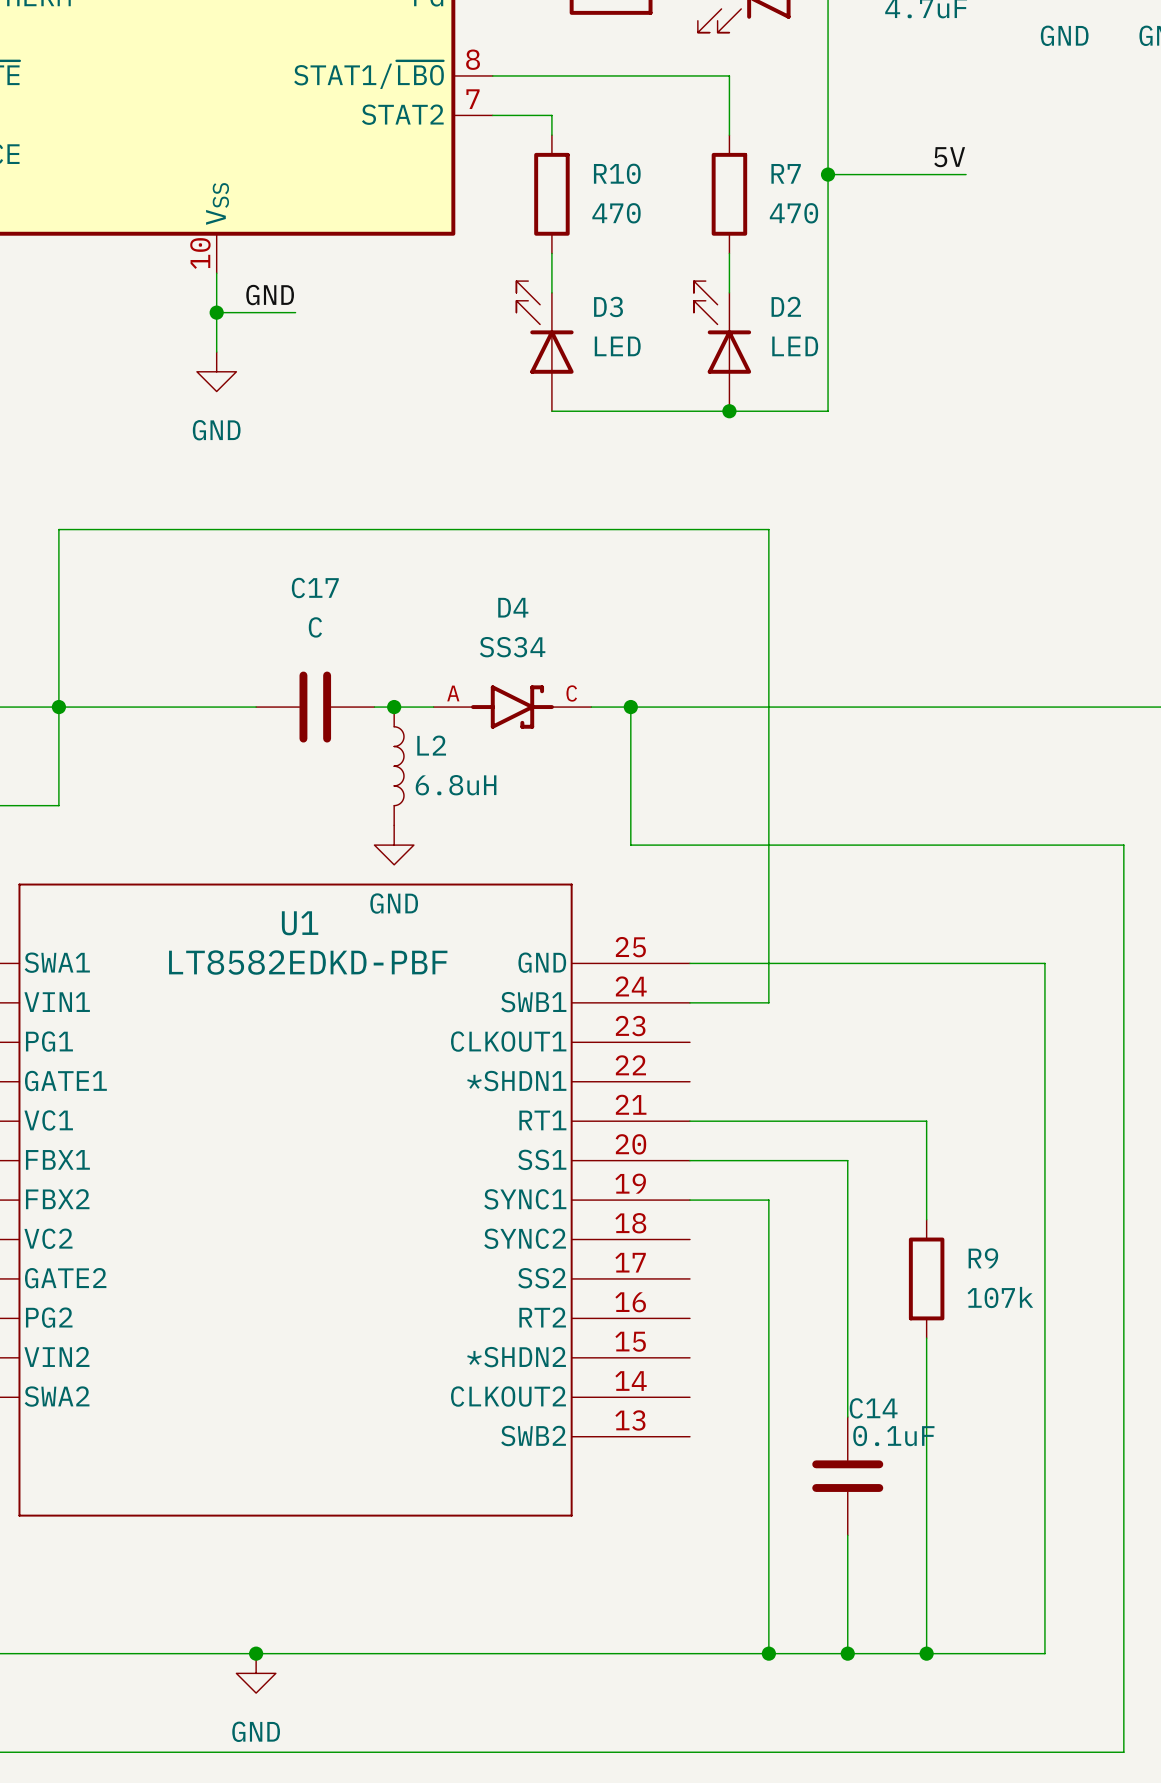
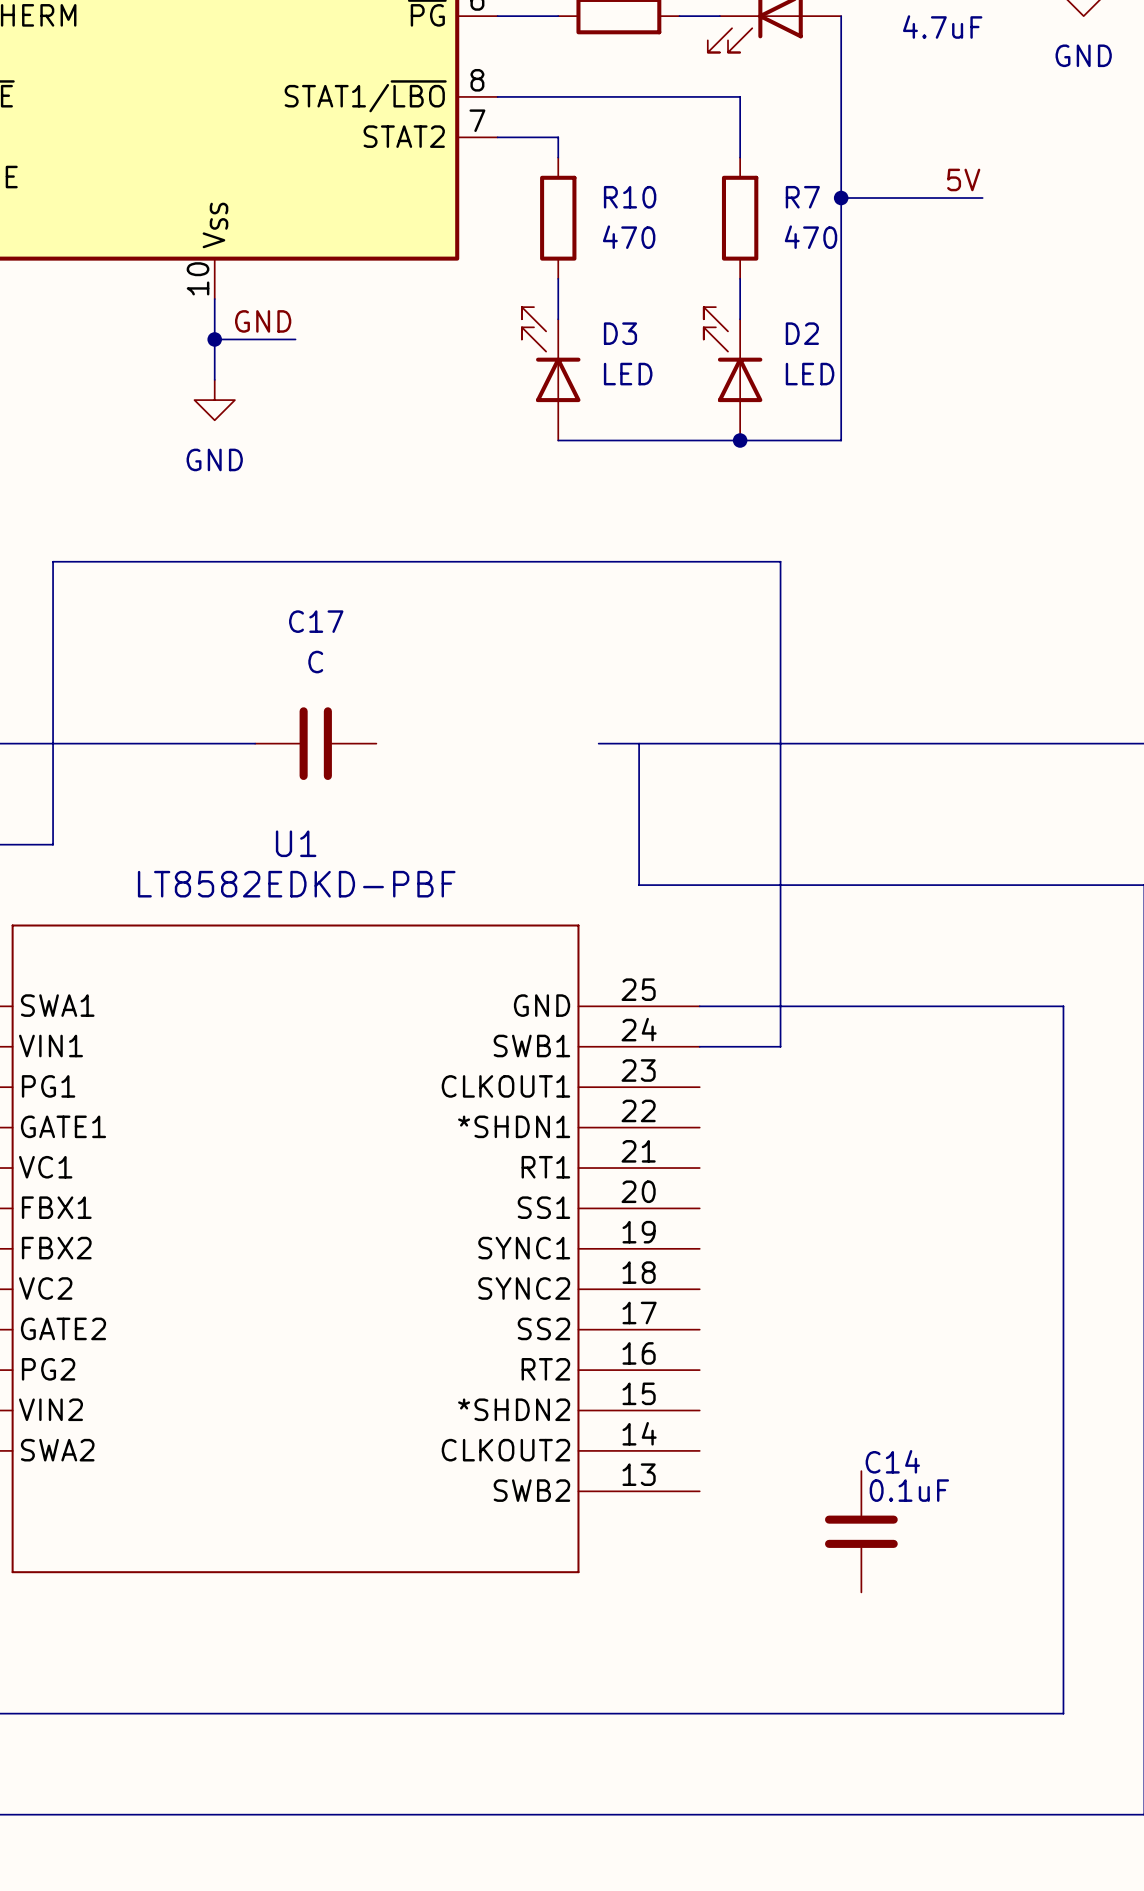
junction: (58, 707) -> none
wire: (374, 707) (433, 707) -> none
junction: (394, 707) -> none
D4: SS34 (512, 707) -> none
junction: (630, 707) -> none
L2: 6.8uH (399, 766) -> none
power symbol: GND (394, 845) -> none
U1 name position: U1 (300, 923) -> U1 (296, 843)
U1 value position: LT8582EDKD-PBF (308, 962) -> LT8582EDKD-PBF (296, 884)
wire: (689, 1121) (926, 1121) (926, 1219) -> none
wire: (689, 1160) (847, 1160) (847, 1417) -> none
wire: (689, 1200) (768, 1200) (768, 1653) -> none
R9: 107k (926, 1278) -> none
wire: (926, 1338) (926, 1653) -> none
wire: (847, 1535) (847, 1653) -> none
junction: (256, 1653) -> none
junction: (768, 1653) -> none
junction: (847, 1653) -> none
junction: (926, 1653) -> none
power symbol: GND (256, 1673) -> none

